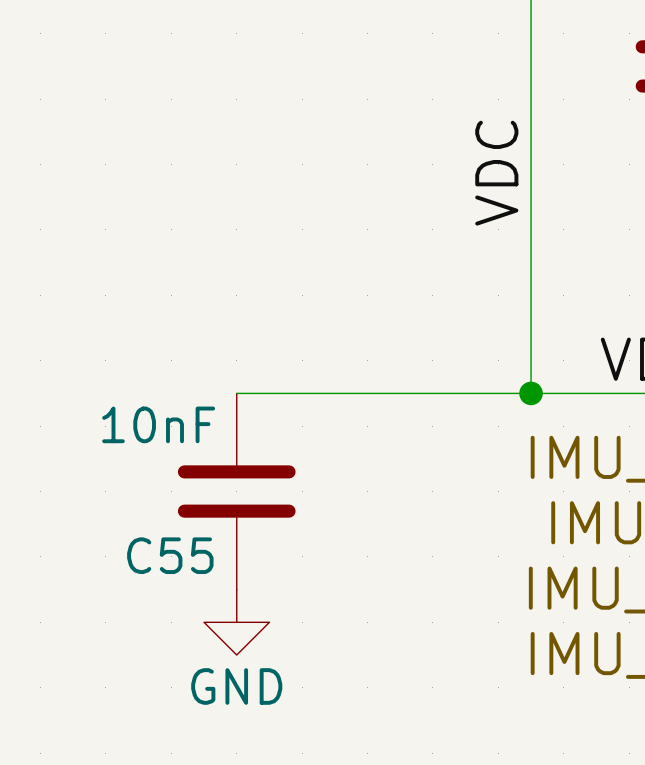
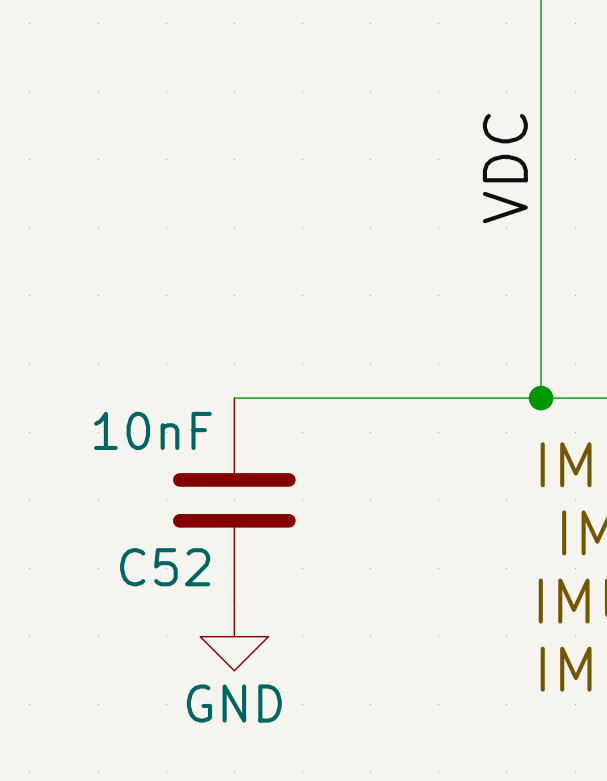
C55 name: C55 (170, 555) -> C52 (165, 567)

